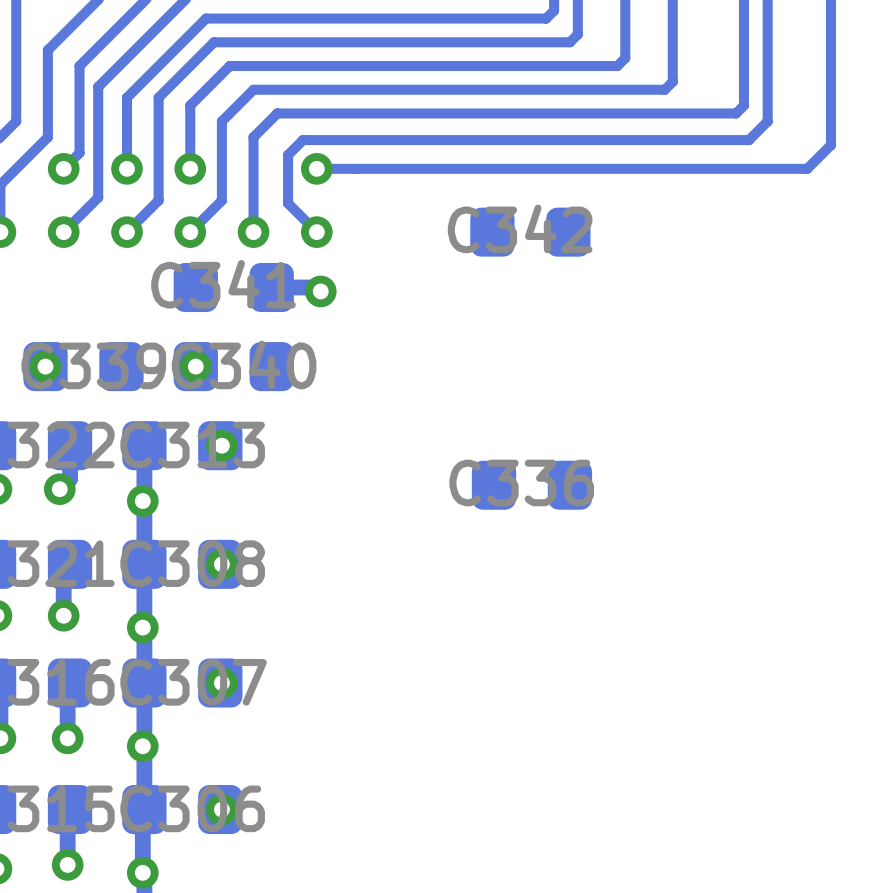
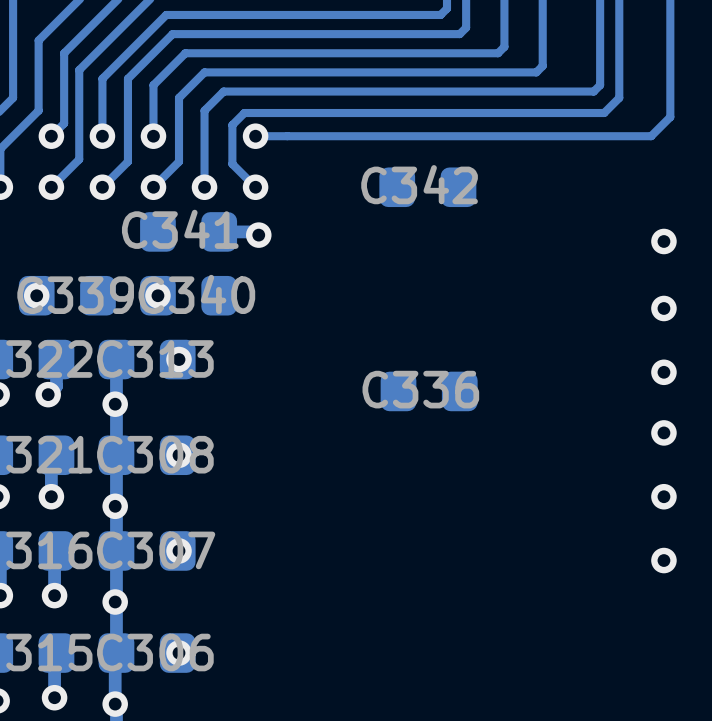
via: none -> (663, 241)
via: none -> (663, 308)
via: none -> (663, 372)
via: none -> (663, 432)
via: none -> (663, 496)
via: none -> (663, 560)

